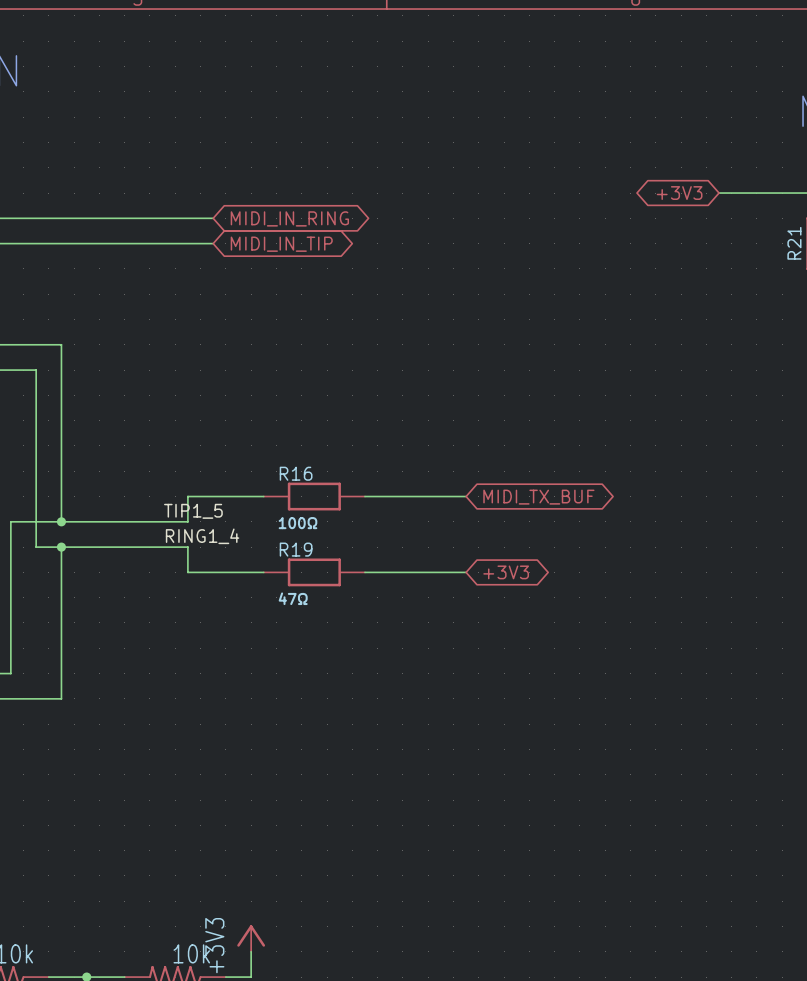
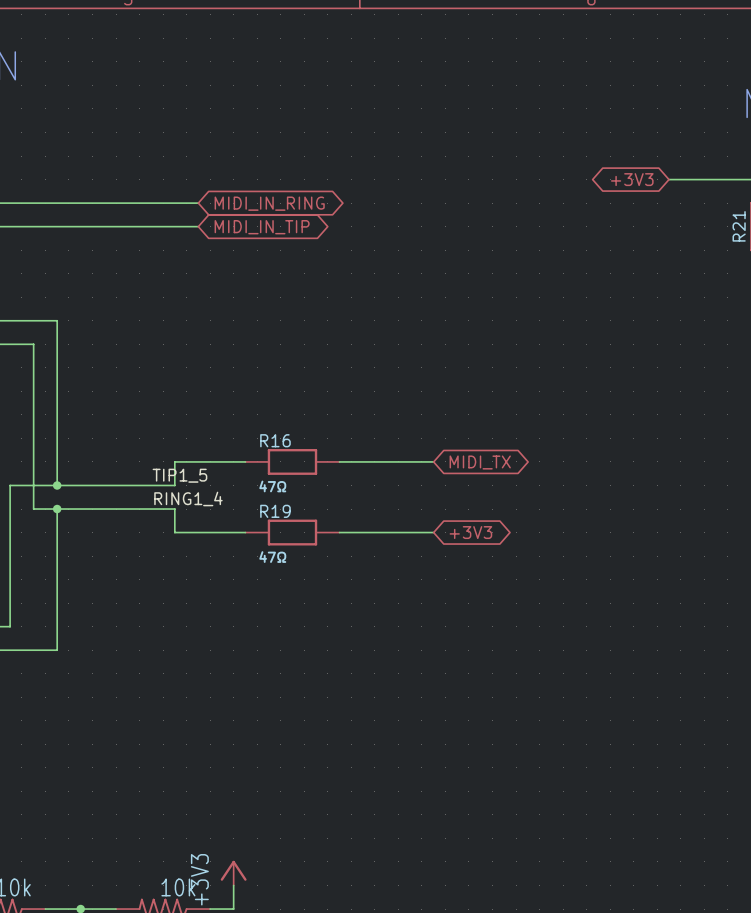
global label: MIDI_TX_BUF (538, 497) -> MIDI_TX (480, 462)
R16 value: 100Ω (298, 523) -> 47Ω (272, 486)

